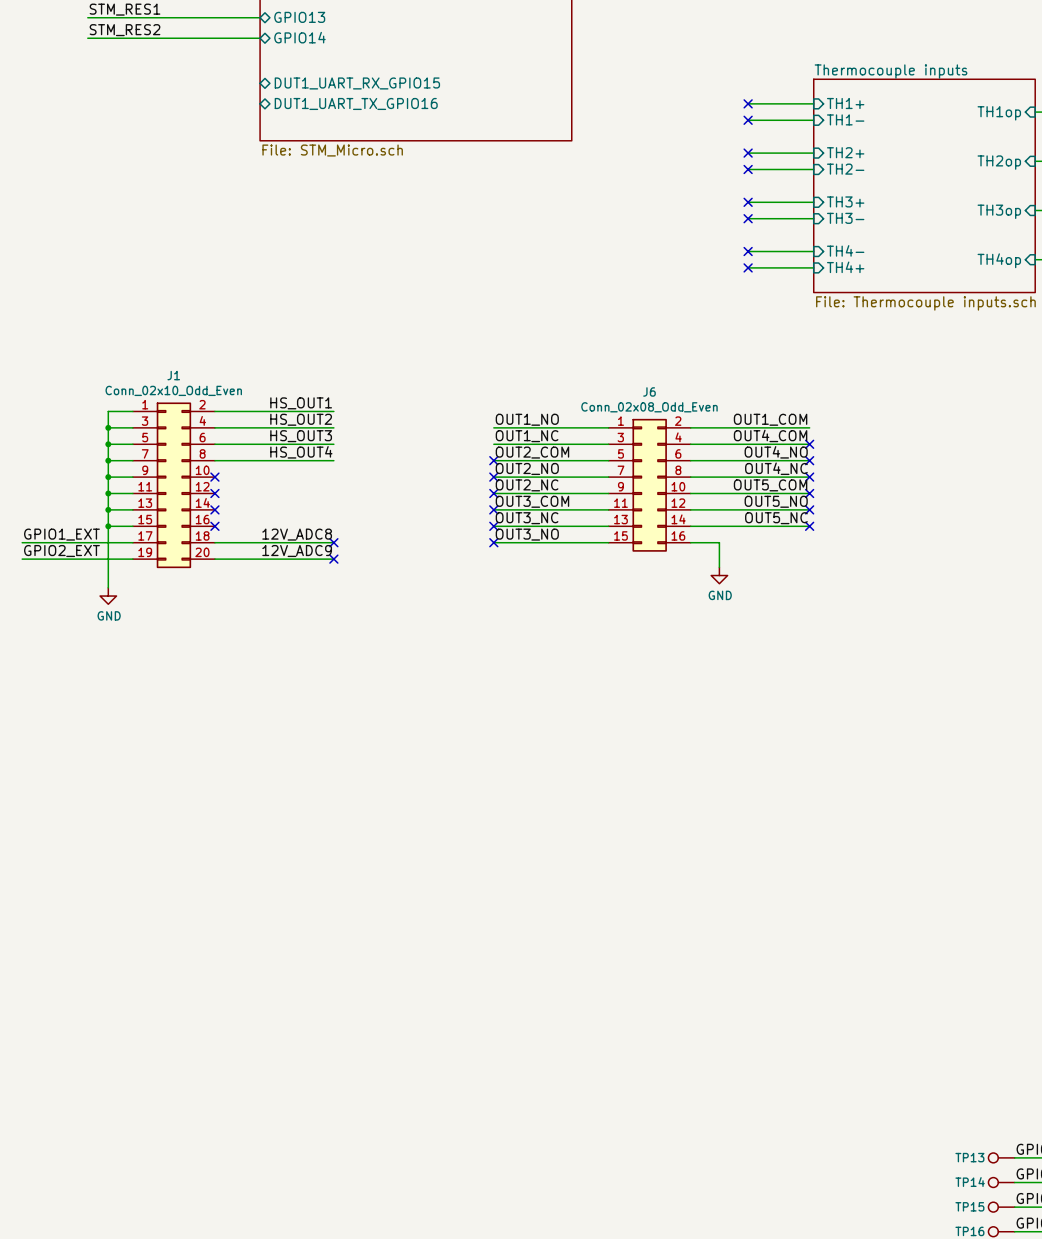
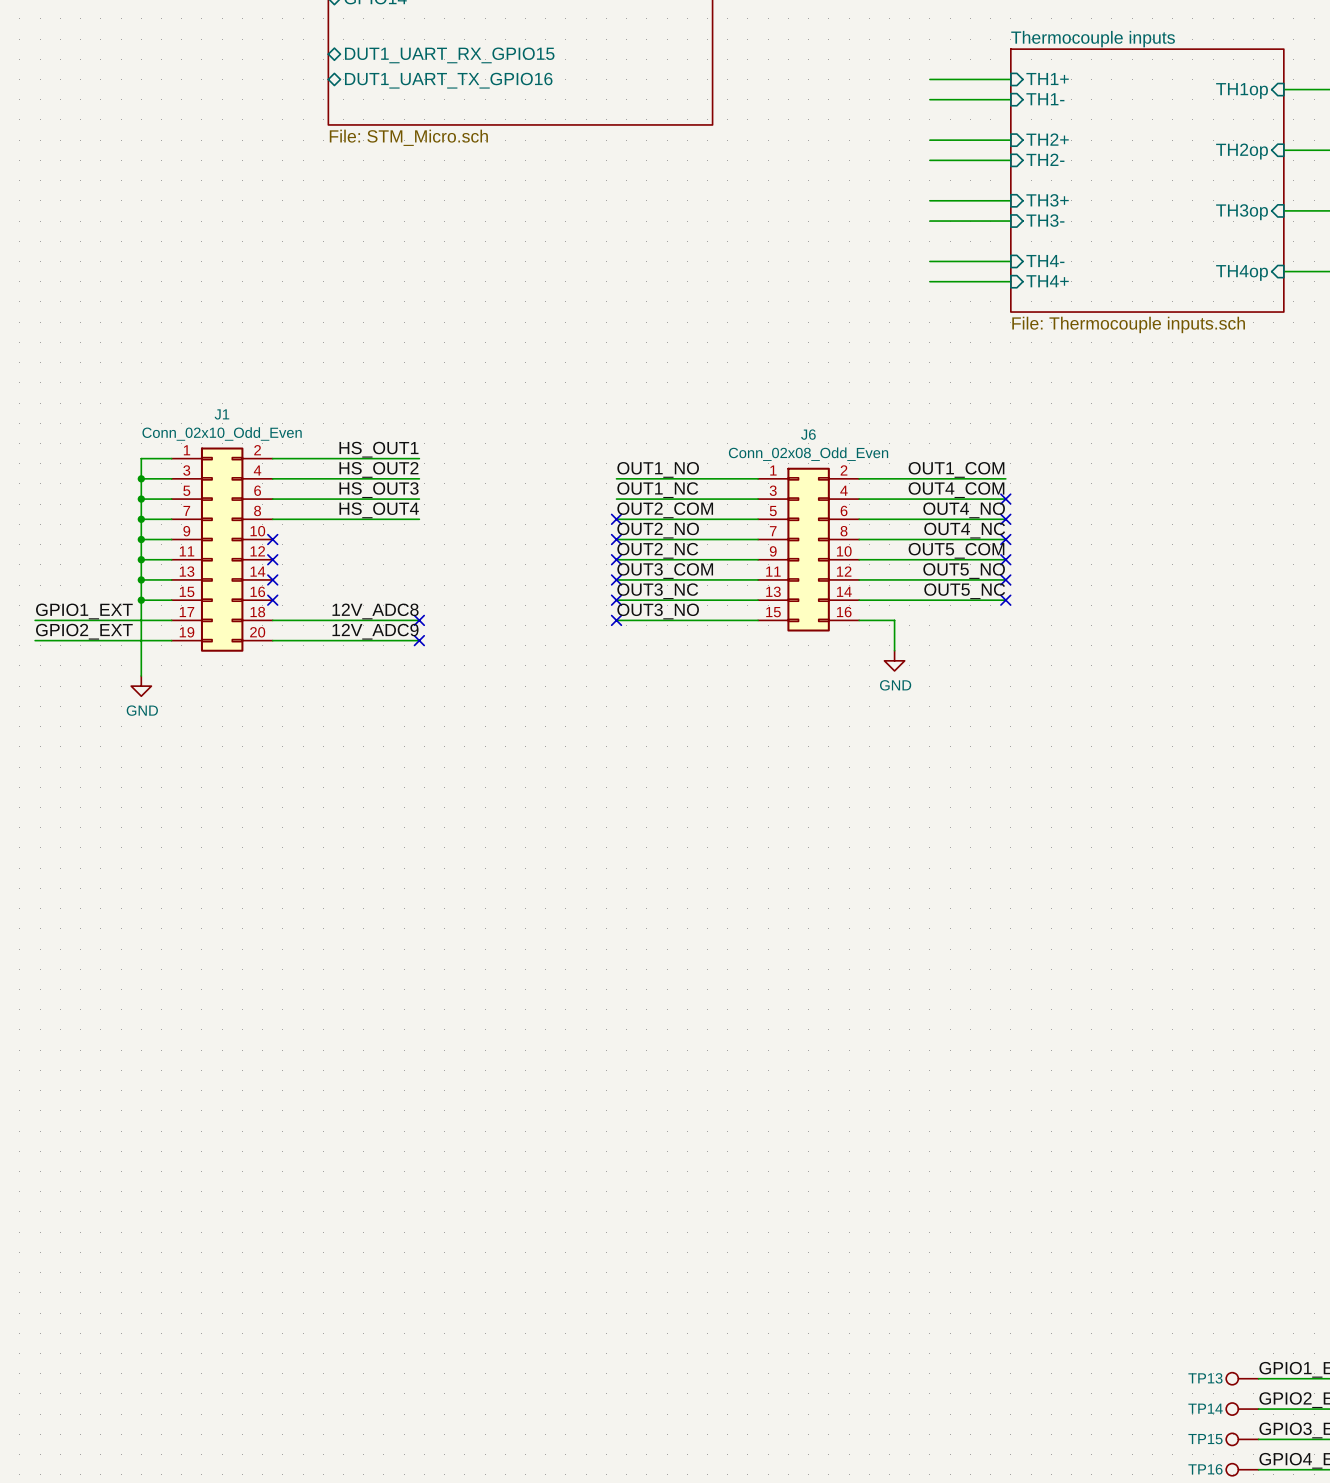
no-connect mark: (748, 103) -> none
no-connect mark: (748, 120) -> none
no-connect mark: (748, 153) -> none
no-connect mark: (748, 169) -> none
no-connect mark: (748, 202) -> none
no-connect mark: (748, 218) -> none
no-connect mark: (748, 251) -> none
no-connect mark: (748, 267) -> none

